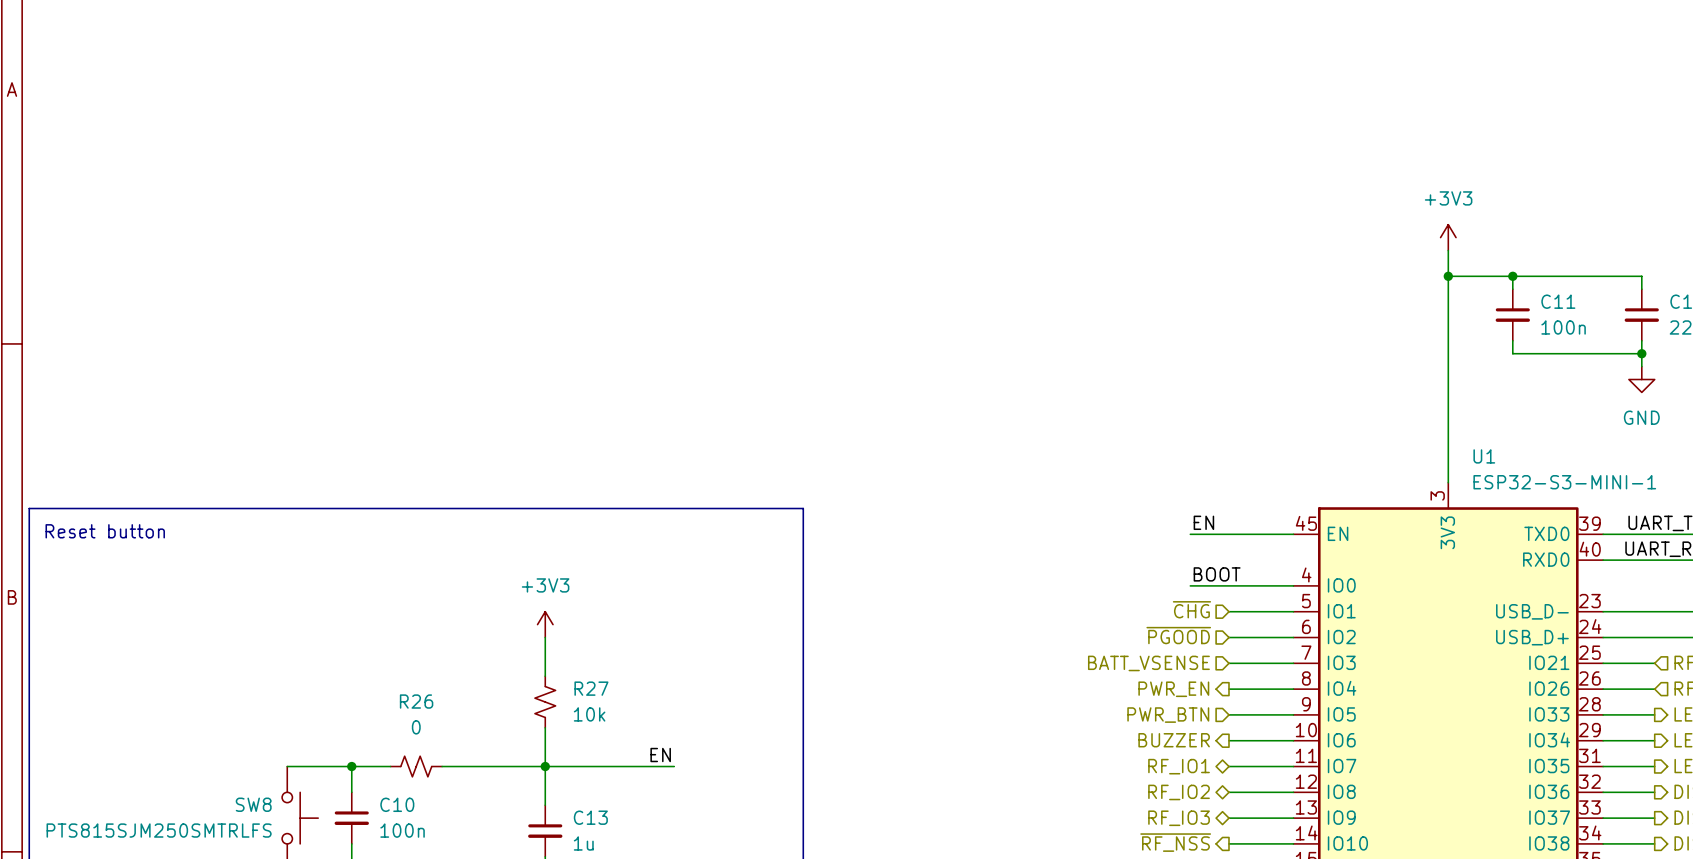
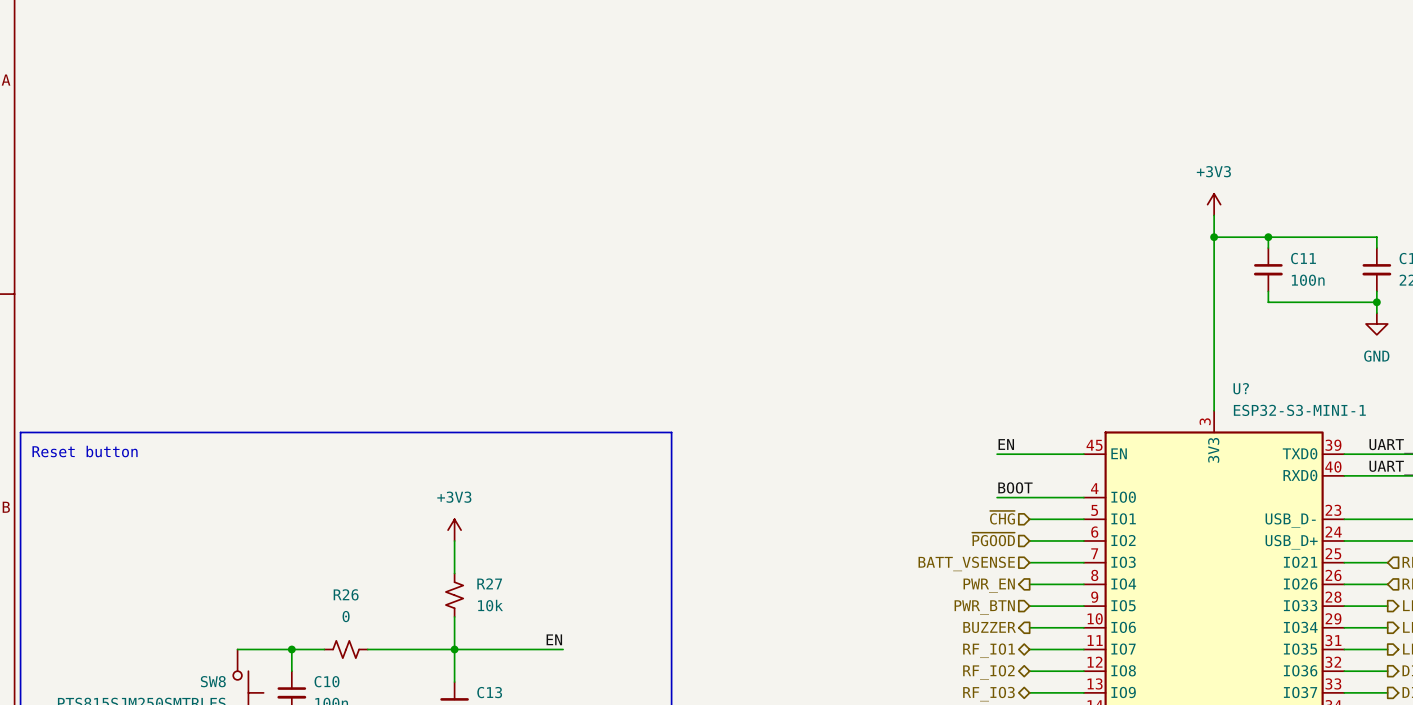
U1 name: U1 (1484, 456) -> U? (1241, 388)

